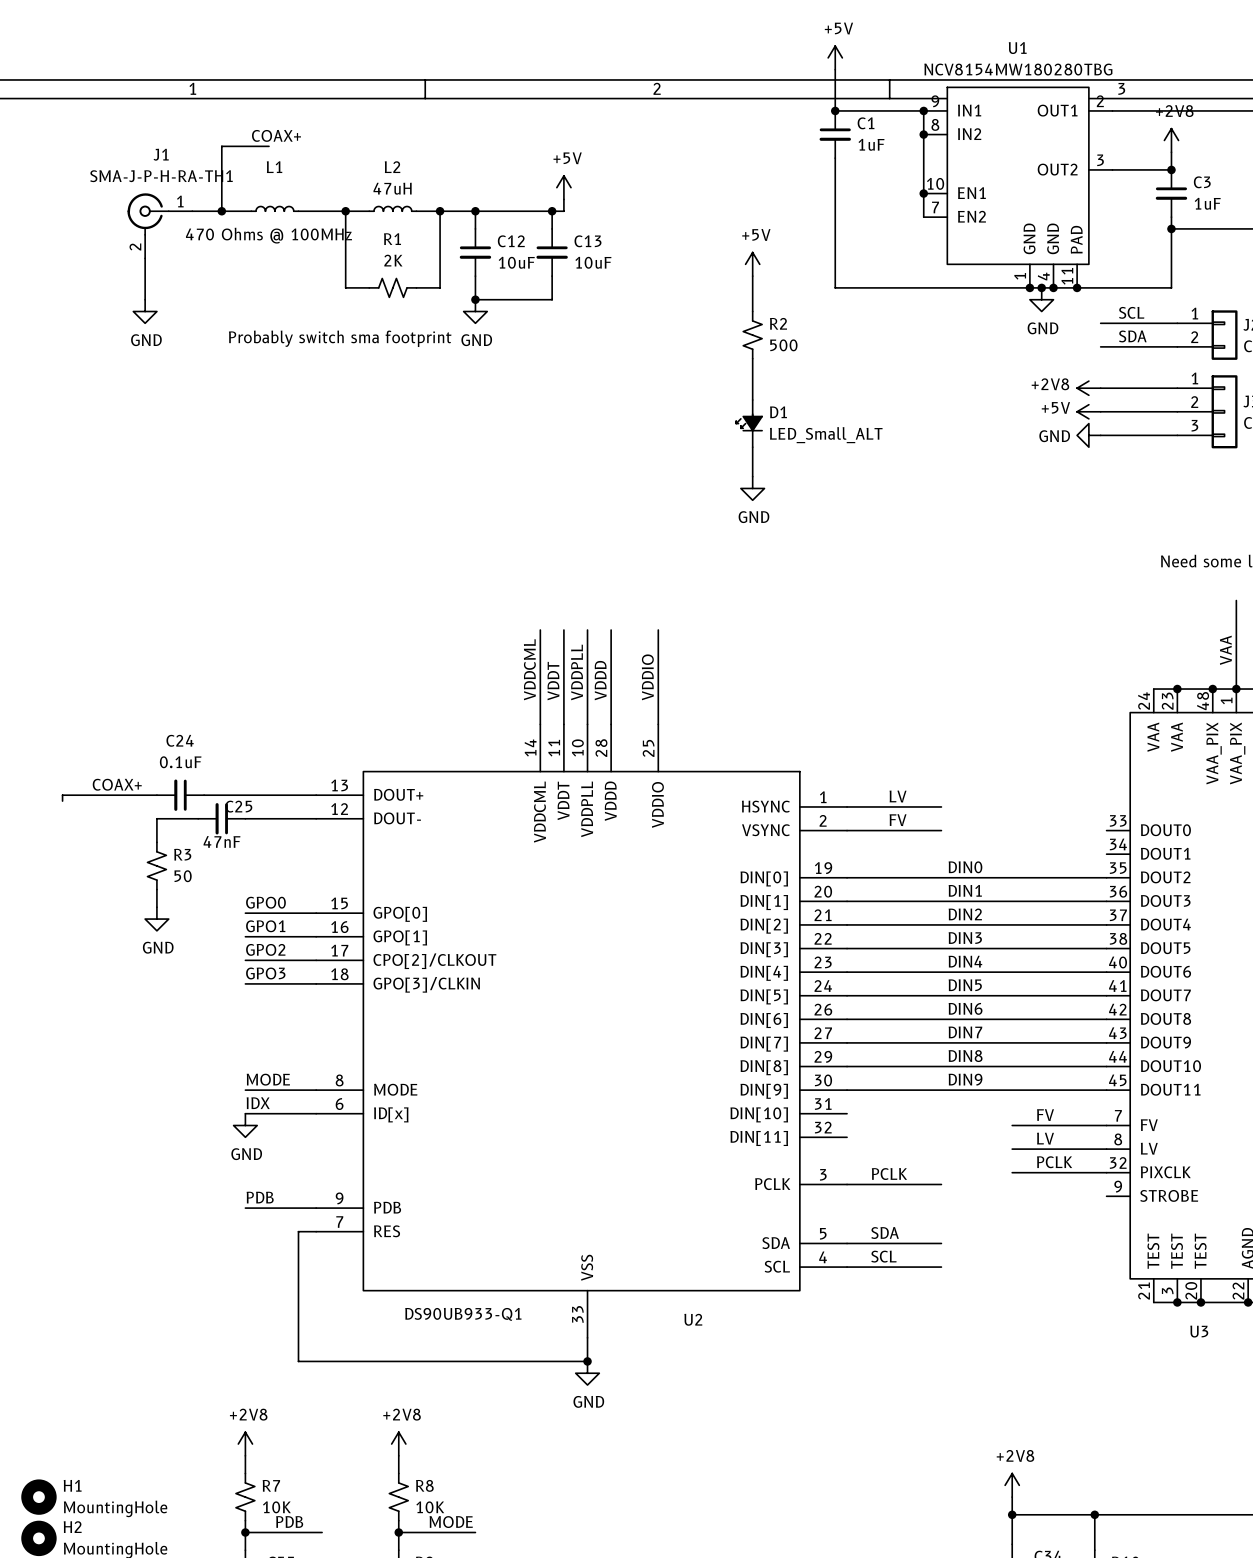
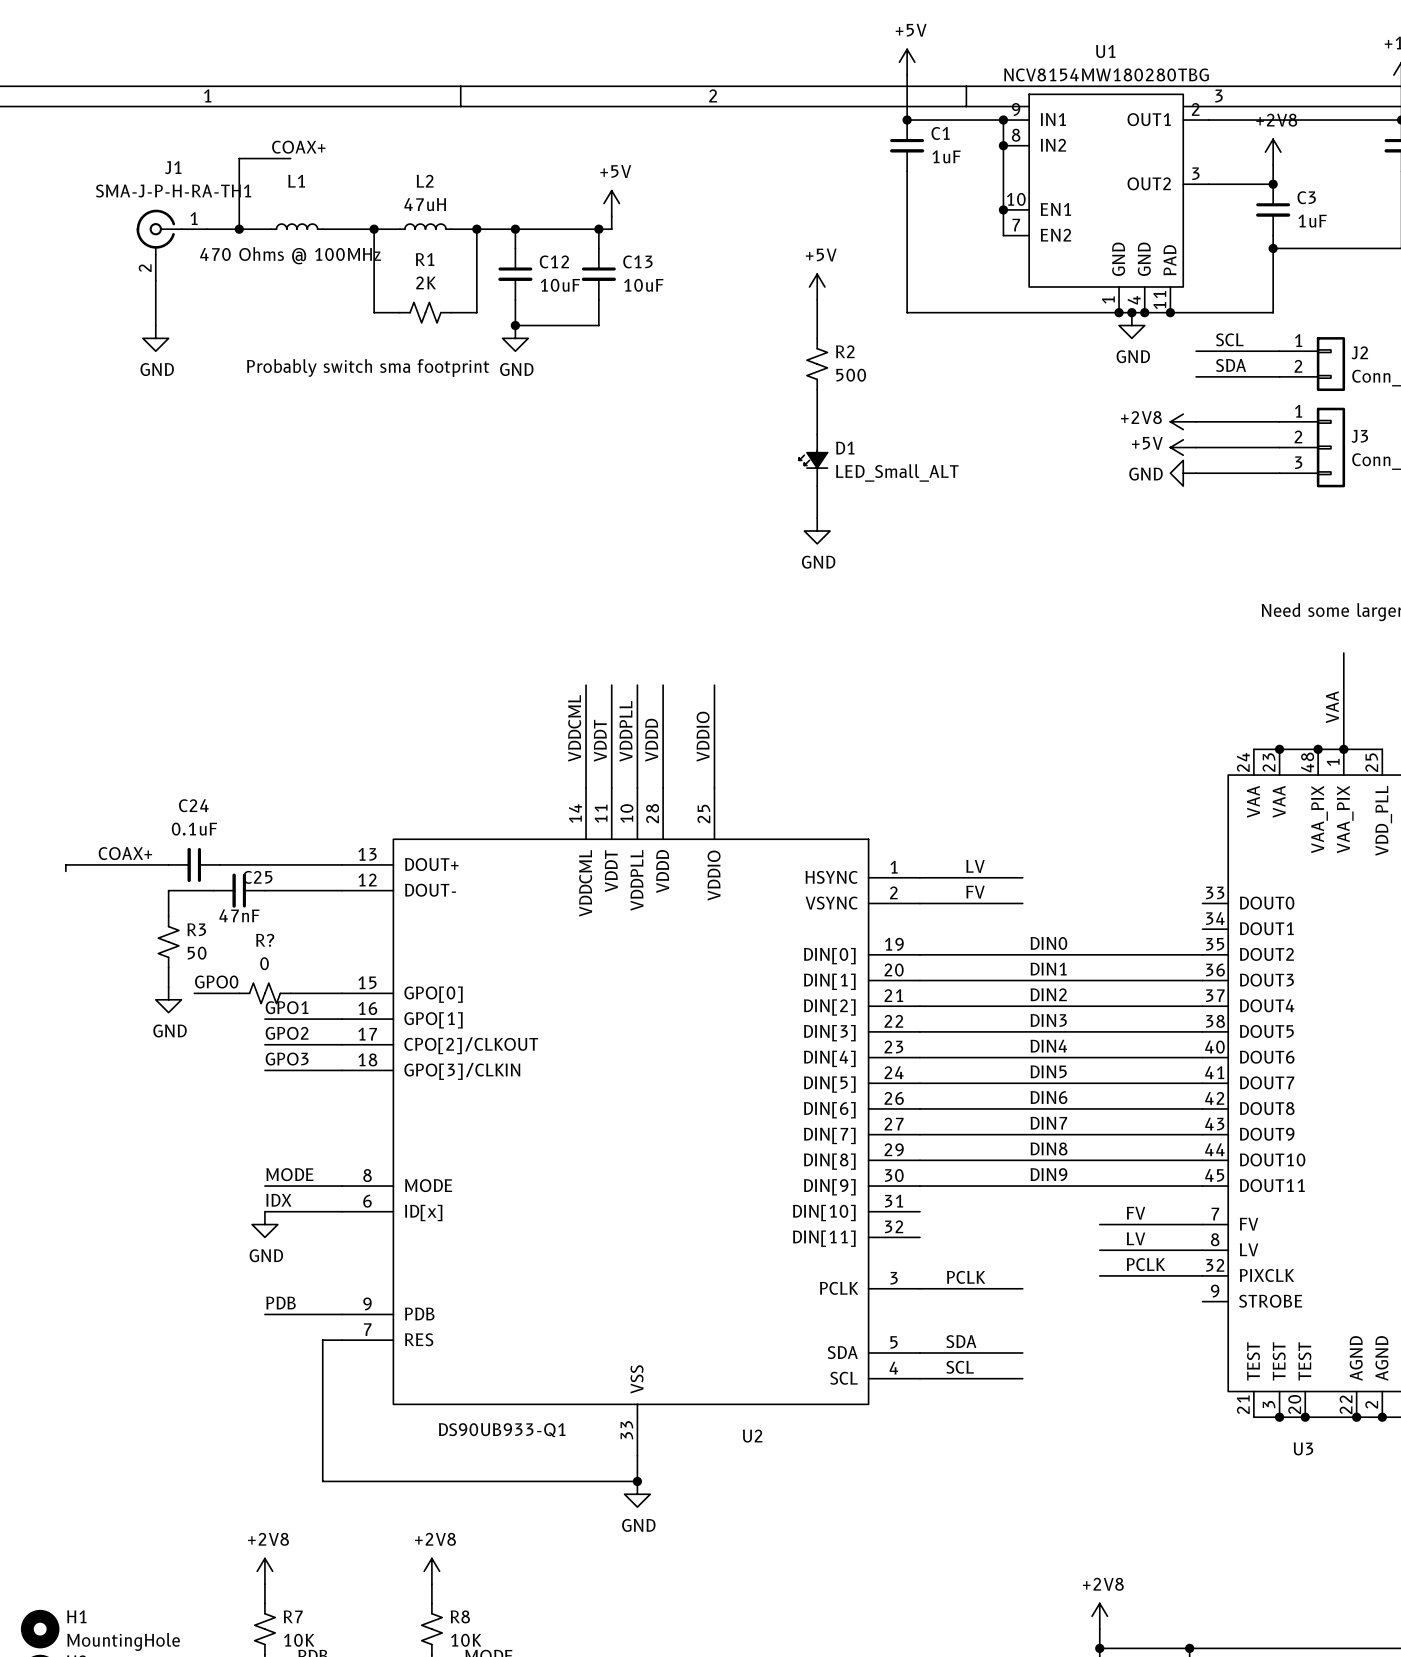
label position: GPO0 (265, 902) -> GPO0 (216, 982)
wire: none -> (194, 993) (239, 993)
R?: none -> 0 (264, 993)

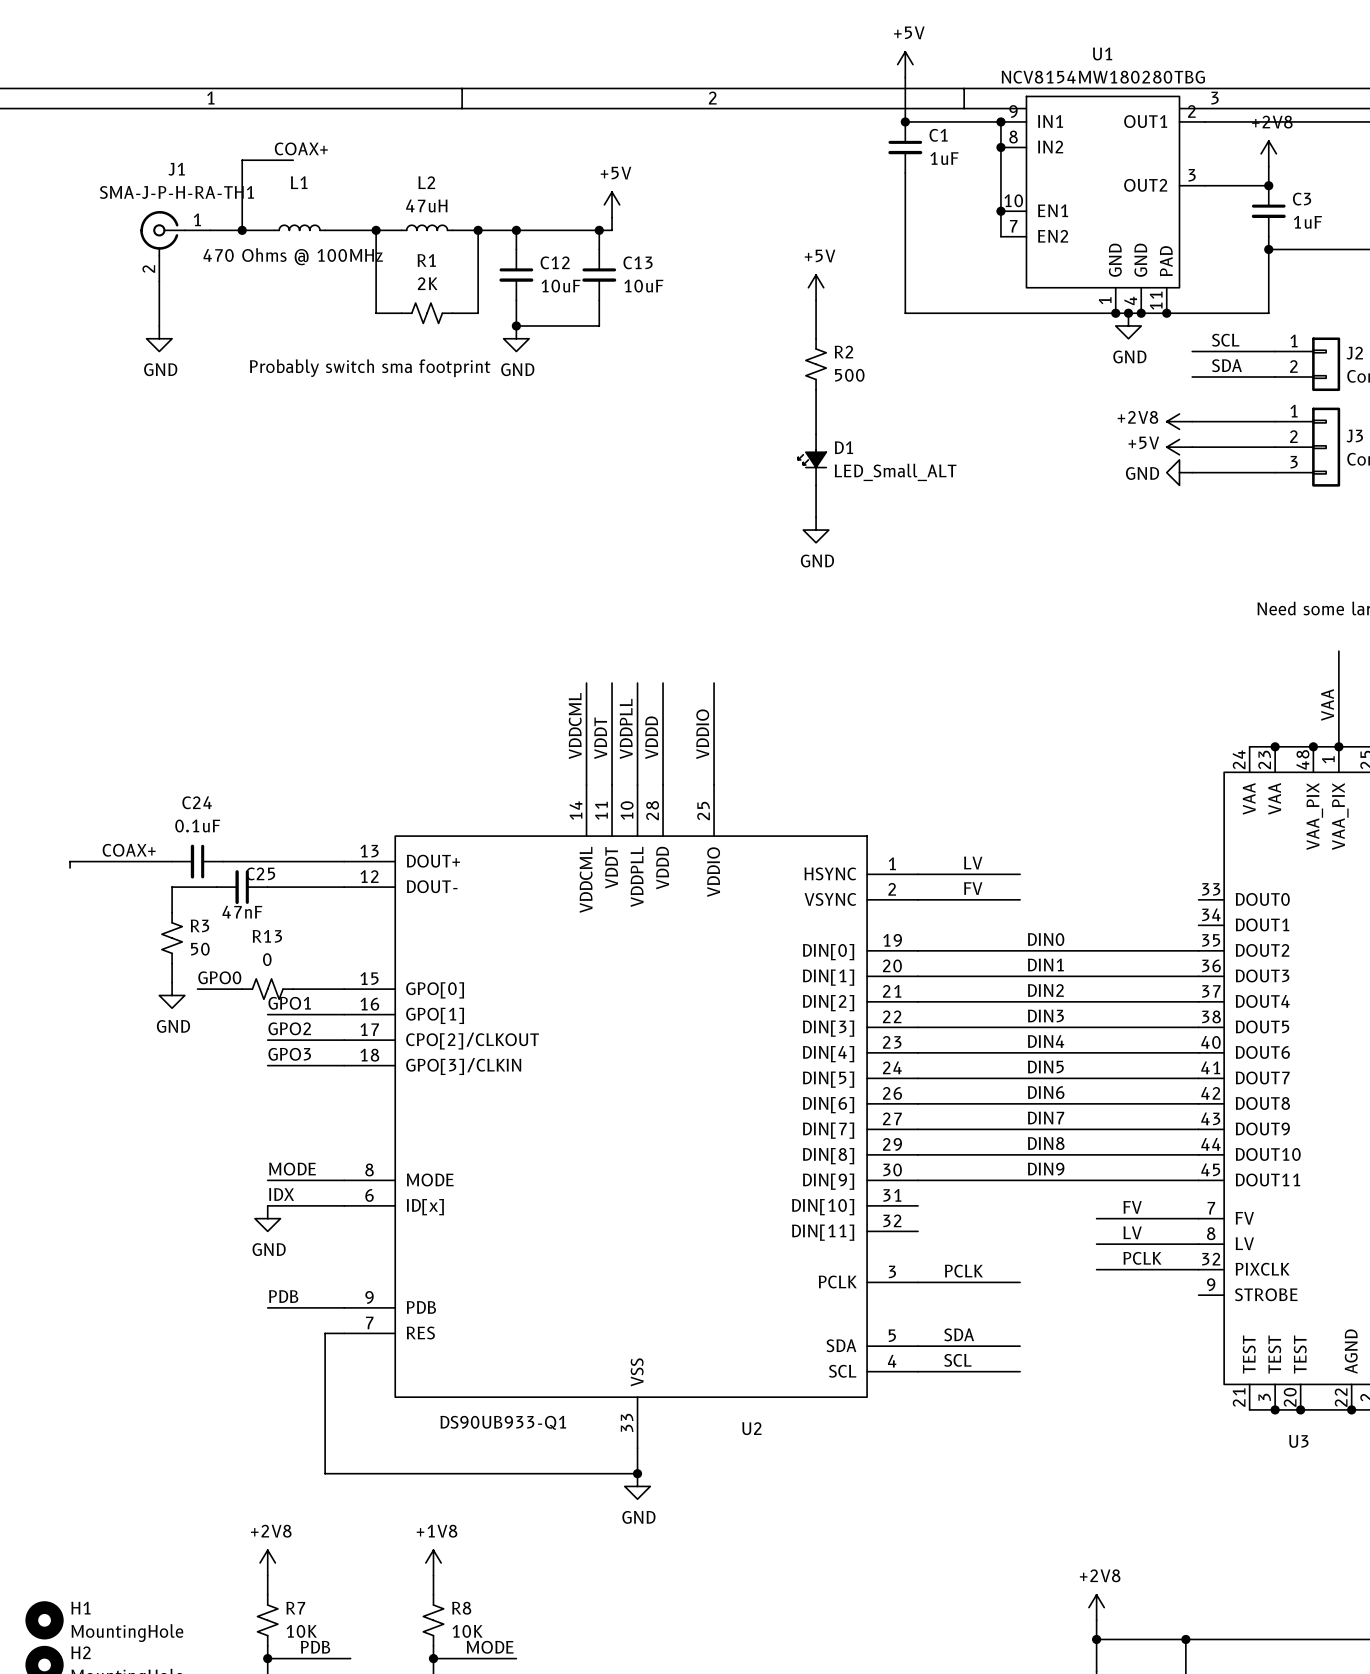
R? name: R? (265, 940) -> R13 (267, 936)
power symbol: +2V8 (431, 1571) -> +1V8 (433, 1562)

